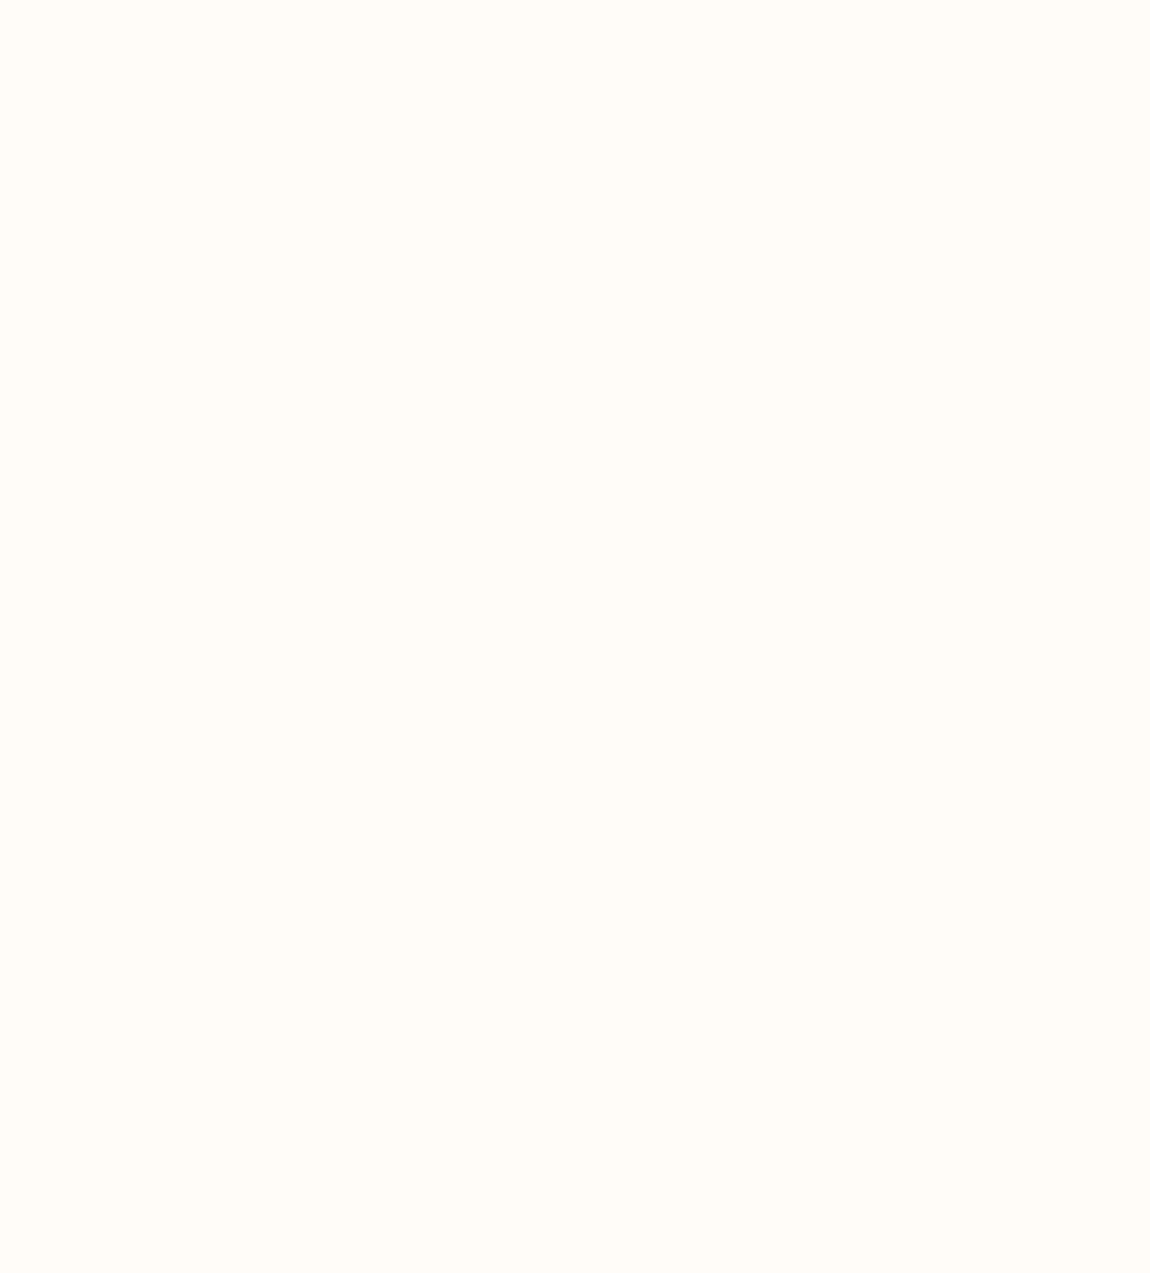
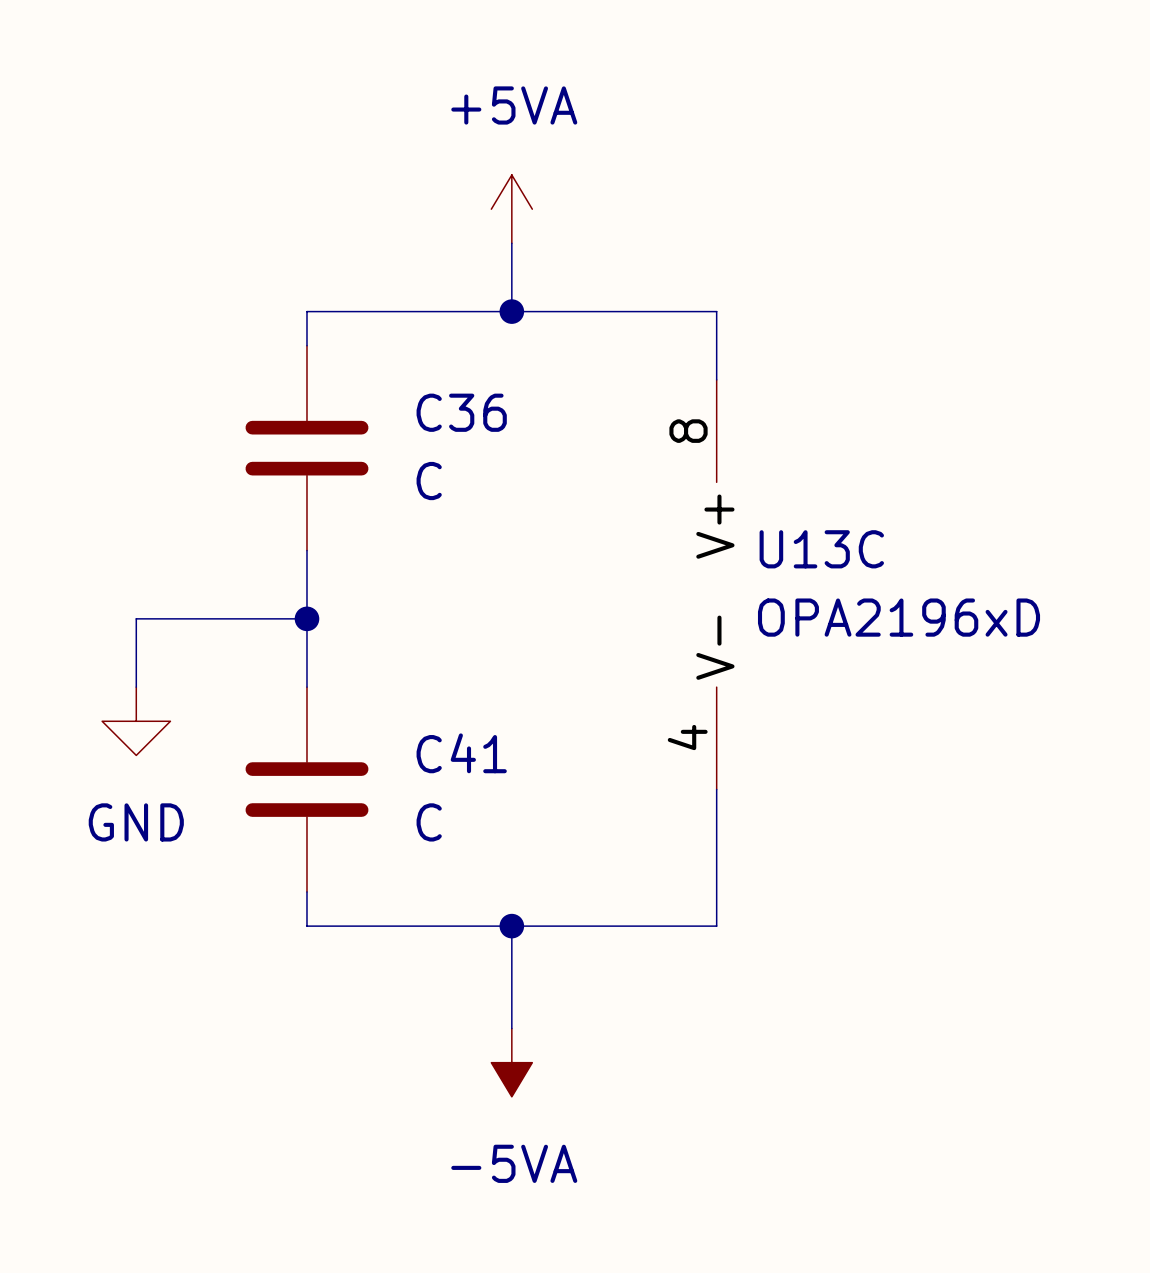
power symbol: none -> +5VA (511, 209)
wire: none -> (511, 243) (511, 311)
junction: none -> (511, 311)
wire: none -> (306, 345) (306, 311) (716, 311) (716, 379)
C36: none -> C (306, 448)
wire: none -> (306, 550) (306, 687)
U13C: none -> OPA2196xD (716, 584)
wire: none -> (306, 618) (136, 618) (136, 687)
junction: none -> (306, 618)
power symbol: none -> GND (136, 721)
C41: none -> C (306, 789)
wire: none -> (716, 789) (716, 926) (306, 926) (306, 891)
wire: none -> (511, 926) (511, 1028)
junction: none -> (511, 926)
power symbol: none -> -5VA (511, 1062)

